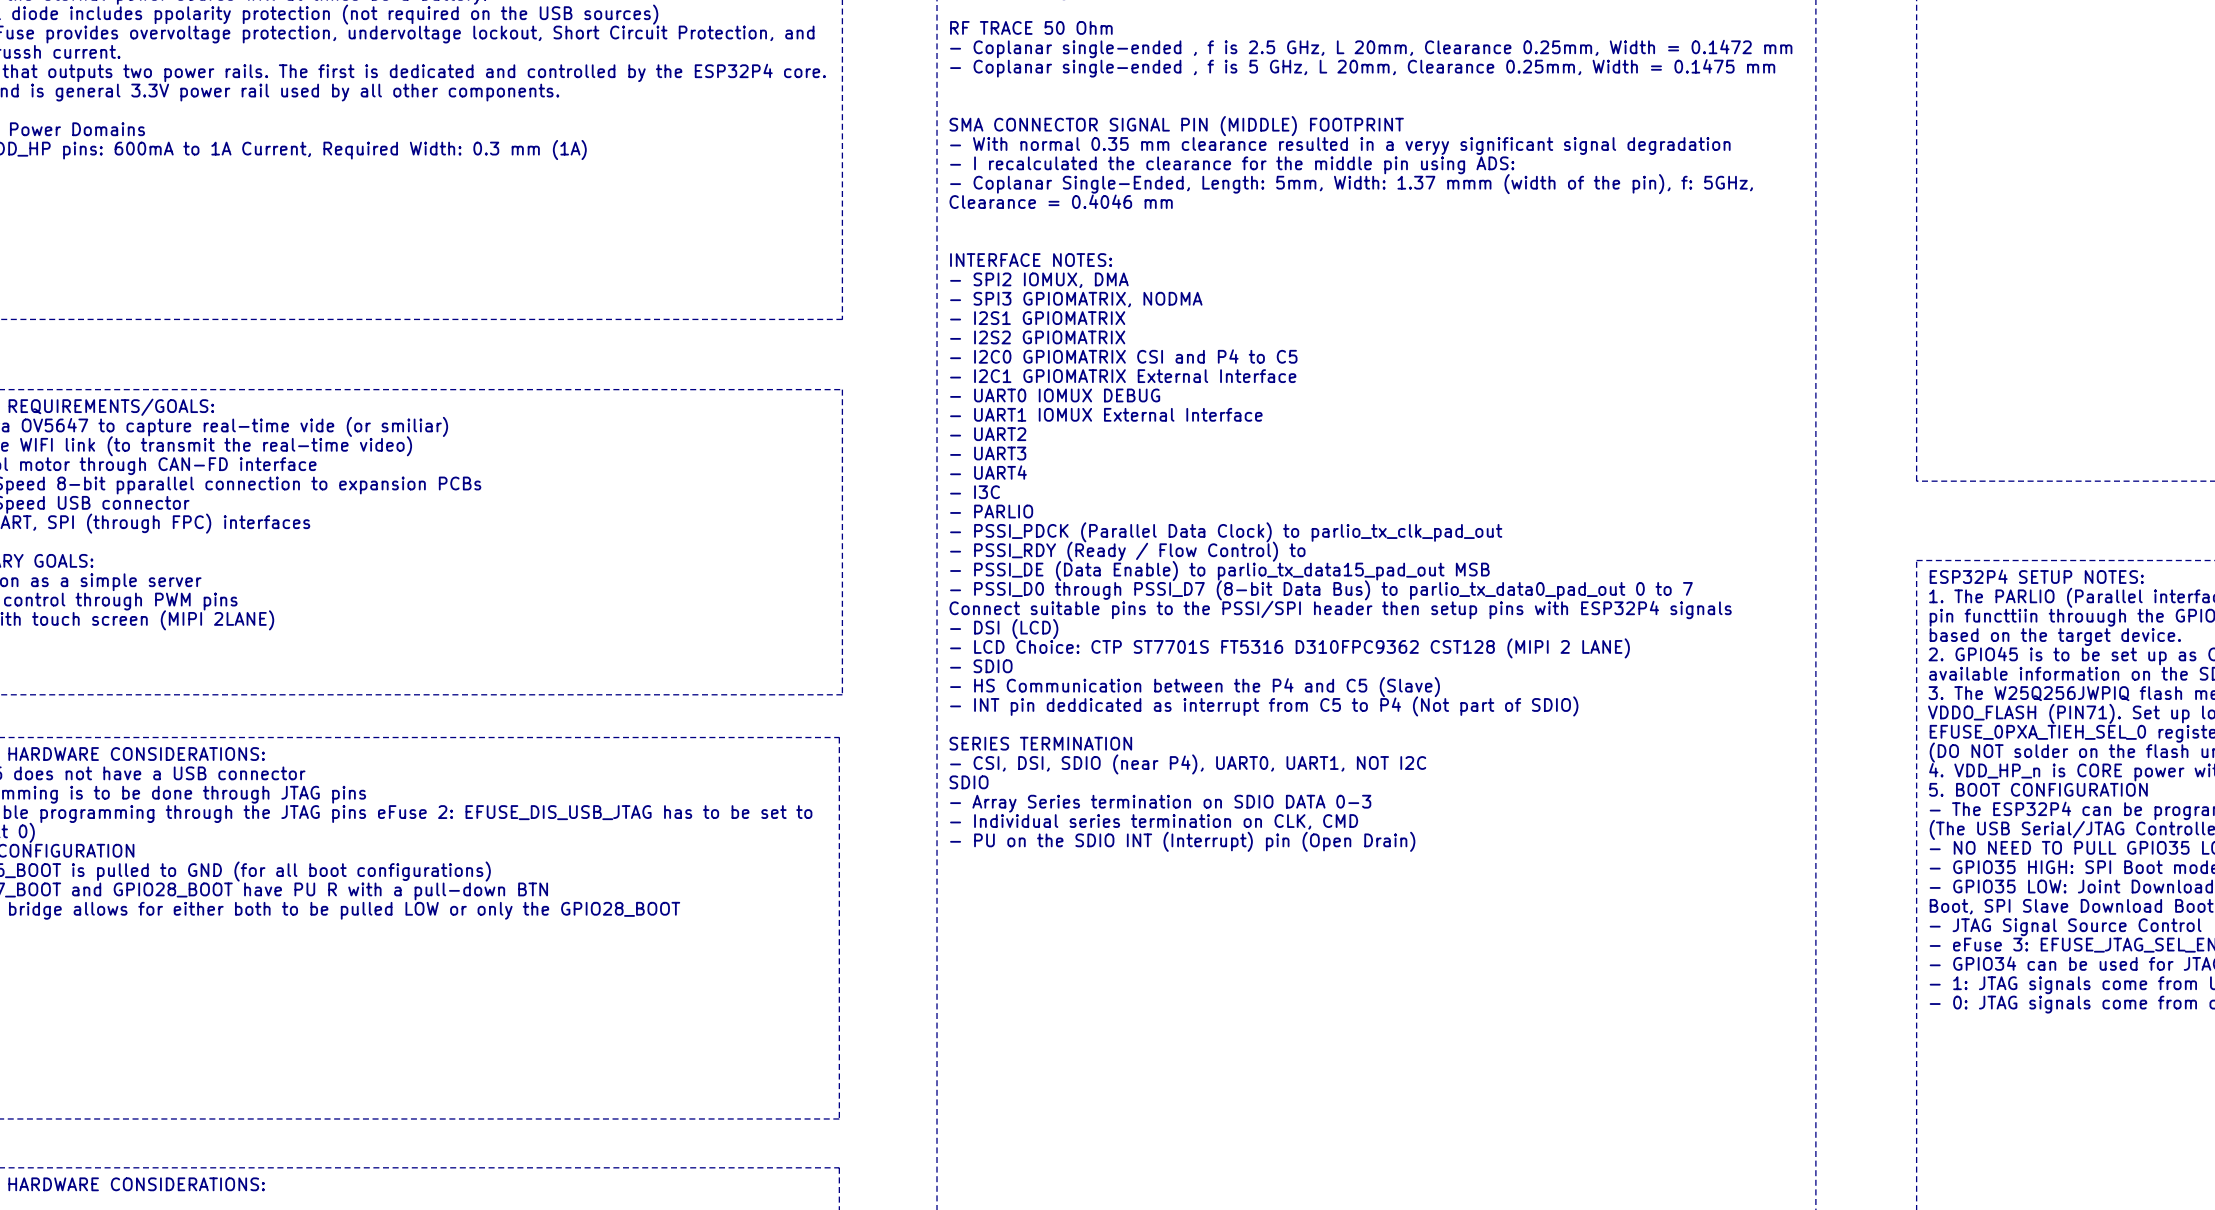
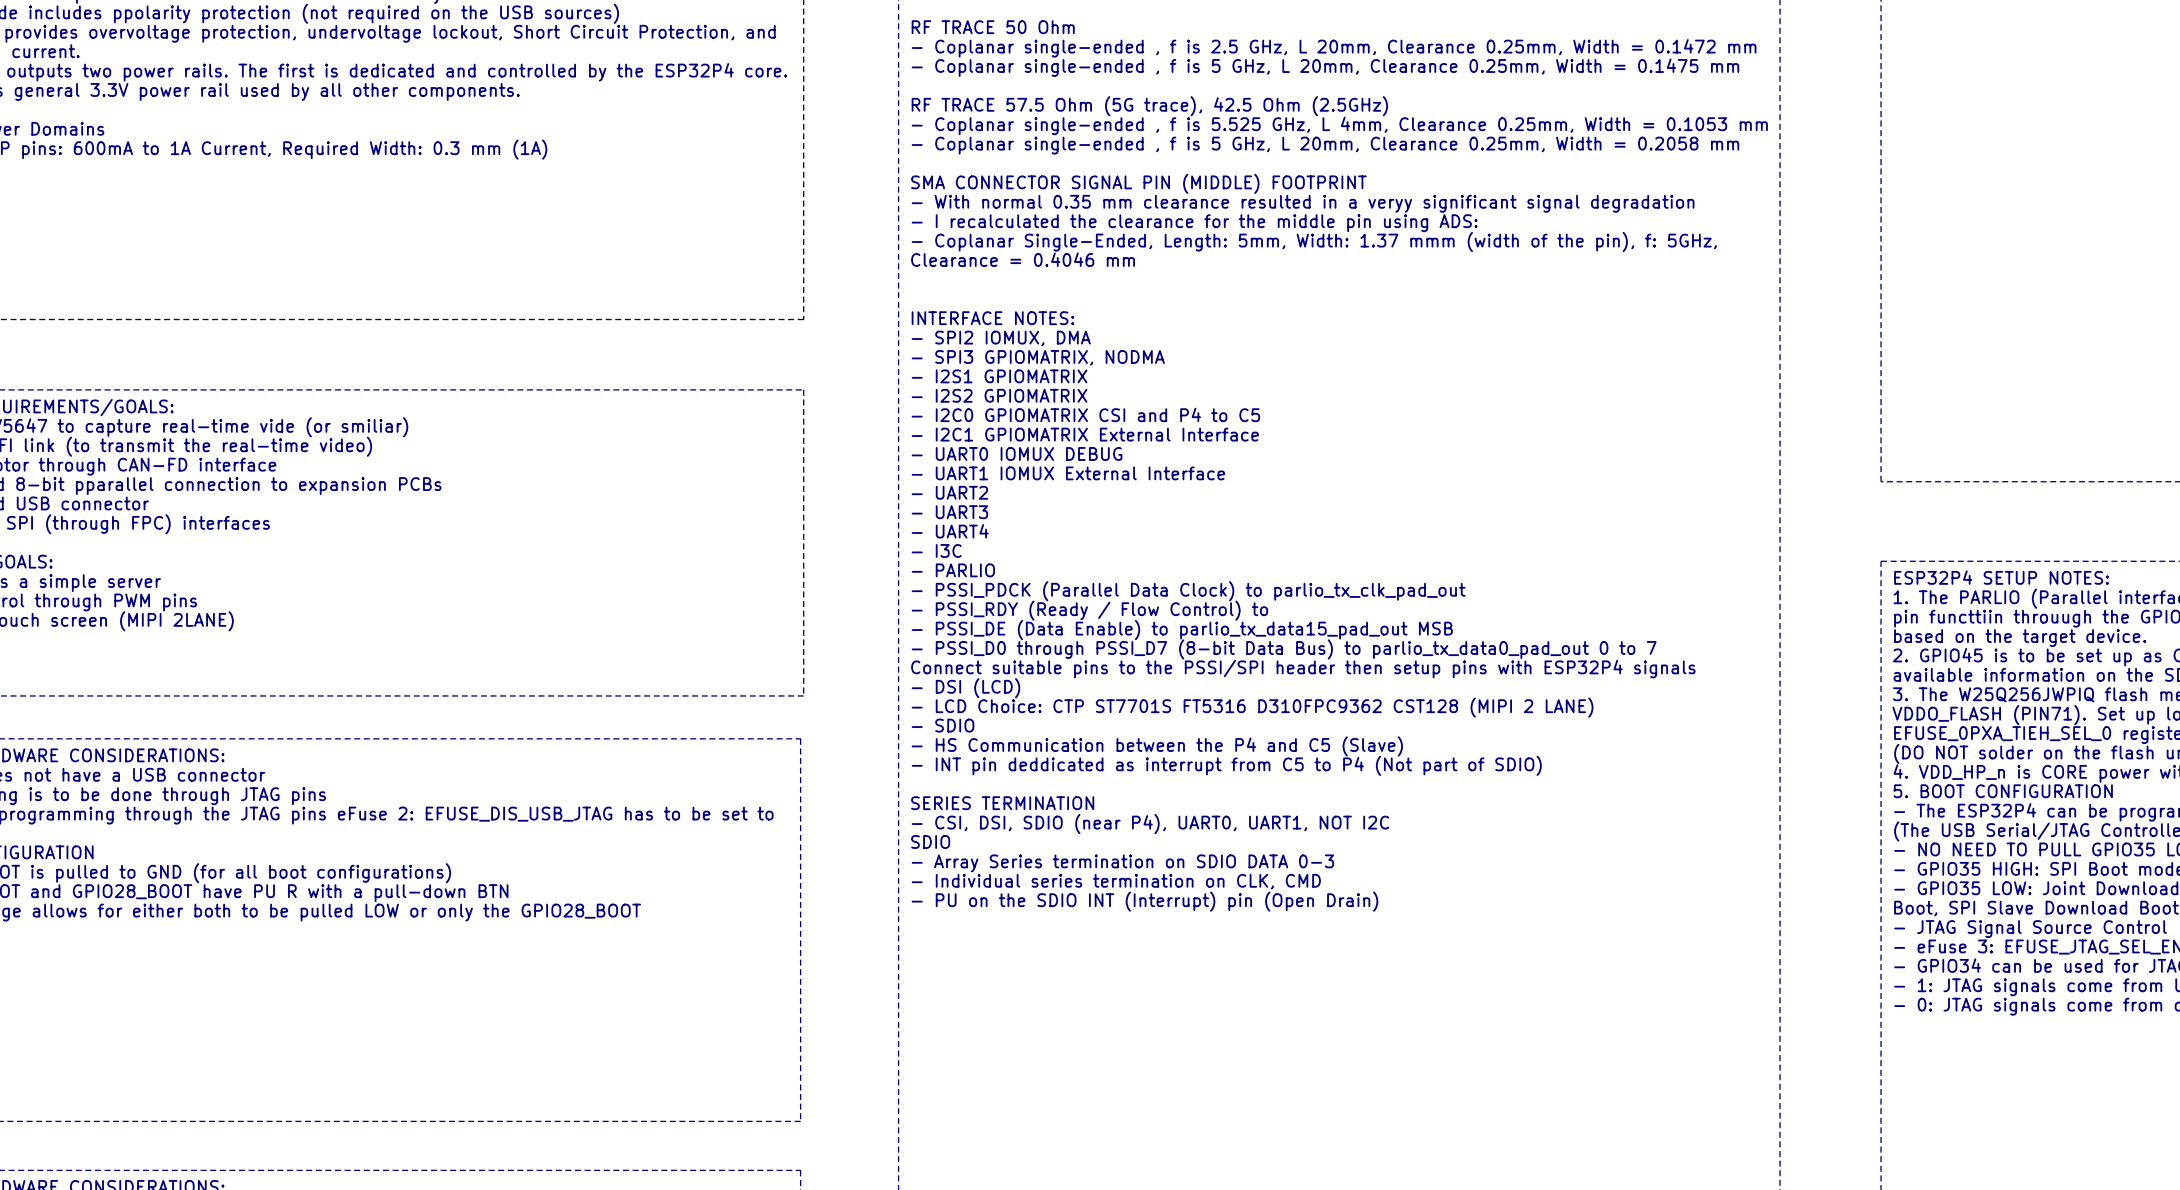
text: none -> RF TRACE 57.5 Ohm (5G trace), 42.5 Ohm (2.5GHz) (1149, 106)
text: SMA CONNECTOR SIGNAL PIN (MIDDLE) FOOTPRINT (1176, 126) -> - Coplanar single-ended , f is 5.525 GHz, L 4mm, Clearance 0.25mm, Width = 0.1053 mm (1339, 125)
text: - With normal 0.35 mm clearance resulted in a veryy significant signal degradation (1340, 146) -> - Coplanar single-ended , f is 5 GHz, L 20mm, Clearance 0.25mm, Width = 0.2058 mm (1325, 145)
text position: - I recalculated the clearance for the middle pin using ADS: (1232, 165) -> - I recalculated the clearance for the middle pin using ADS: (1194, 223)
text: - Coplanar Single-Ended, Length: 5mm, Width: 1.37 mmm (width of the pin), f: 5GHz, (1351, 184) -> SMA CONNECTOR SIGNAL PIN (MIDDLE) FOOTPRINT (1138, 183)
text: Clearance = 0.4046 mm (1061, 201) -> - With normal 0.35 mm clearance resulted in a veryy significant signal degradation (1303, 203)
text: none -> - Coplanar Single-Ended, Length: 5mm, Width: 1.37 mmm (width of the pin), f: 5GHz, (1314, 242)
text: INTERFACE NOTES: (1031, 260) -> Clearance = 0.4046 mm (1023, 259)
text: - SPI2 IOMUX, DMA (1039, 280) -> none
text: - SPI3 GPIOMATRIX, NODMA (1076, 299) -> none
text: - I2S1 GPIOMATRIX (1037, 318) -> INTERFACE NOTES: (992, 318)
text: - I2S2 GPIOMATRIX (1037, 337) -> - SPI2 IOMUX, DMA (1001, 338)
text: - I2C0 GPIOMATRIX CSI and P4 to C5 (1123, 356) -> - SPI3 GPIOMATRIX, NODMA (1038, 357)
text: - I2C1 GPIOMATRIX External Interface (1123, 376) -> - I2S1 GPIOMATRIX (999, 376)
text: - UART0 IOMUX DEBUG (1055, 395) -> - I2S2 GPIOMATRIX (999, 395)
text: - UART1 IOMUX External Interface (1106, 414) -> - I2C0 GPIOMATRIX CSI and P4 to C5 (1085, 414)
text: - UART2 (988, 434) -> - I2C1 GPIOMATRIX External Interface (1085, 434)
text: - UART3 (988, 453) -> - UART0 IOMUX DEBUG (1017, 453)
text: - UART4 (988, 472) -> - UART1 IOMUX External Interface (1068, 473)
text: - I3C (975, 492) -> - UART2 (949, 492)
text: - PARLIO (991, 511) -> - UART3 (949, 512)
text: - PSSI_PDCK (Parallel Data Clock) to parlio_tx_clk_pad_out (1226, 532) -> - UART4 (950, 531)
text: - PSSI_RDY (Ready / Flow Control) to (1127, 551) -> - I3C (936, 550)
text: - PSSI_DE (Data Enable) to parlio_tx_data15_pad_out MSB (1219, 571) -> - PARLIO (953, 570)
text: - PSSI_D0 through PSSI_D7 (8-bit Data Bus) to parlio_tx_data0_pad_out 0 to 7 (1321, 590) -> - PSSI_PDCK (Parallel Data Clock) to parlio_tx_clk_pad_out (1188, 591)
text: Connect suitable pins to the PSSI/SPI header then setup pins with ESP32P4 signals (1340, 609) -> - PSSI_RDY (Ready / Flow Control) to (1089, 610)
text: - DSI (LCD) (1004, 629) -> - PSSI_DE (Data Enable) to parlio_tx_data15_pad_out MSB (1182, 630)
text: - LCD Choice: CTP ST7701S FT5316 D310FPC9362 CST128 (MIPI 2 LANE) (1289, 648) -> - PSSI_D0 through PSSI_D7 (8-bit Data Bus) to parlio_tx_data0_pad_out 0 to 7 (1284, 649)
text: - SDIO (981, 666) -> Connect suitable pins to the PSSI/SPI header then setup pins with ESP32P4 signals (1303, 669)
text: - HS Communication between the P4 and C5 (Slave) (1195, 687) -> - DSI (LCD) (965, 688)
text: - INT pin deddicated as interrupt from C5 to P4 (Not part of SDIO) (1264, 706) -> - LCD Choice: CTP ST7701S FT5316 D310FPC9362 CST128 (MIPI 2 LANE) (1252, 707)
text: none -> - SDIO (943, 725)
text: SERIES TERMINATION (1040, 743) -> - HS Communication between the P4 and C5 (Slave) (1157, 746)
text: - CSI, DSI, SDIO (near P4), UART0, UART1, NOT I2C (1188, 764) -> - INT pin deddicated as interrupt from C5 to P4 (Not part of SDIO) (1226, 765)
text: SDIO (969, 782) -> none
text: - Array Series termination on SDIO DATA 0-3 (1160, 803) -> SERIES TERMINATION (1002, 803)
text: - Individual series termination on CLK, CMD (1154, 821) -> - CSI, DSI, SDIO (near P4), UART0, UART1, NOT I2C (1150, 824)
text: - PU on the SDIO INT (Interrupt) pin (Open Drain) (1182, 841) -> SDIO (930, 841)
text: none -> - Array Series termination on SDIO DATA 0-3 (1122, 863)
text: none -> - Individual series termination on CLK, CMD (1116, 881)
text: none -> - PU on the SDIO INT (Interrupt) pin (Open Drain) (1144, 901)

